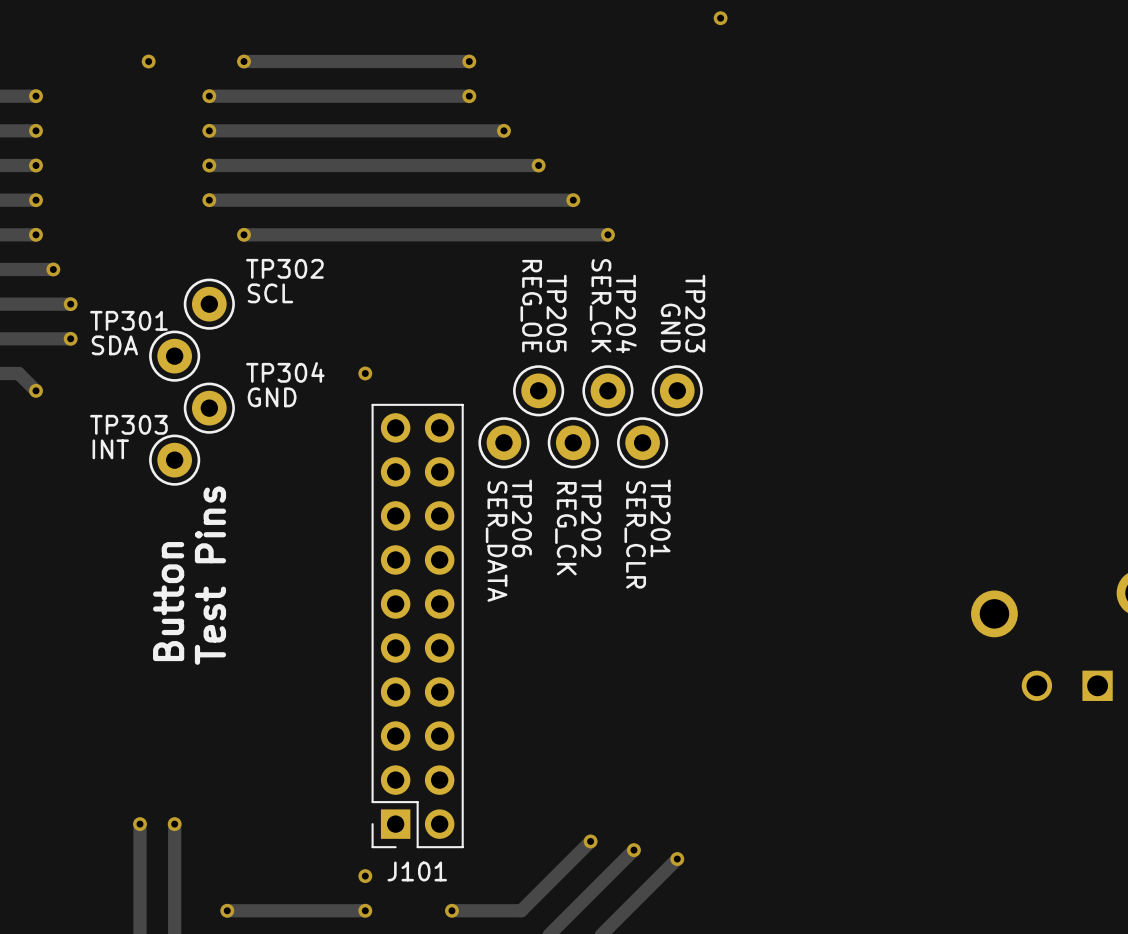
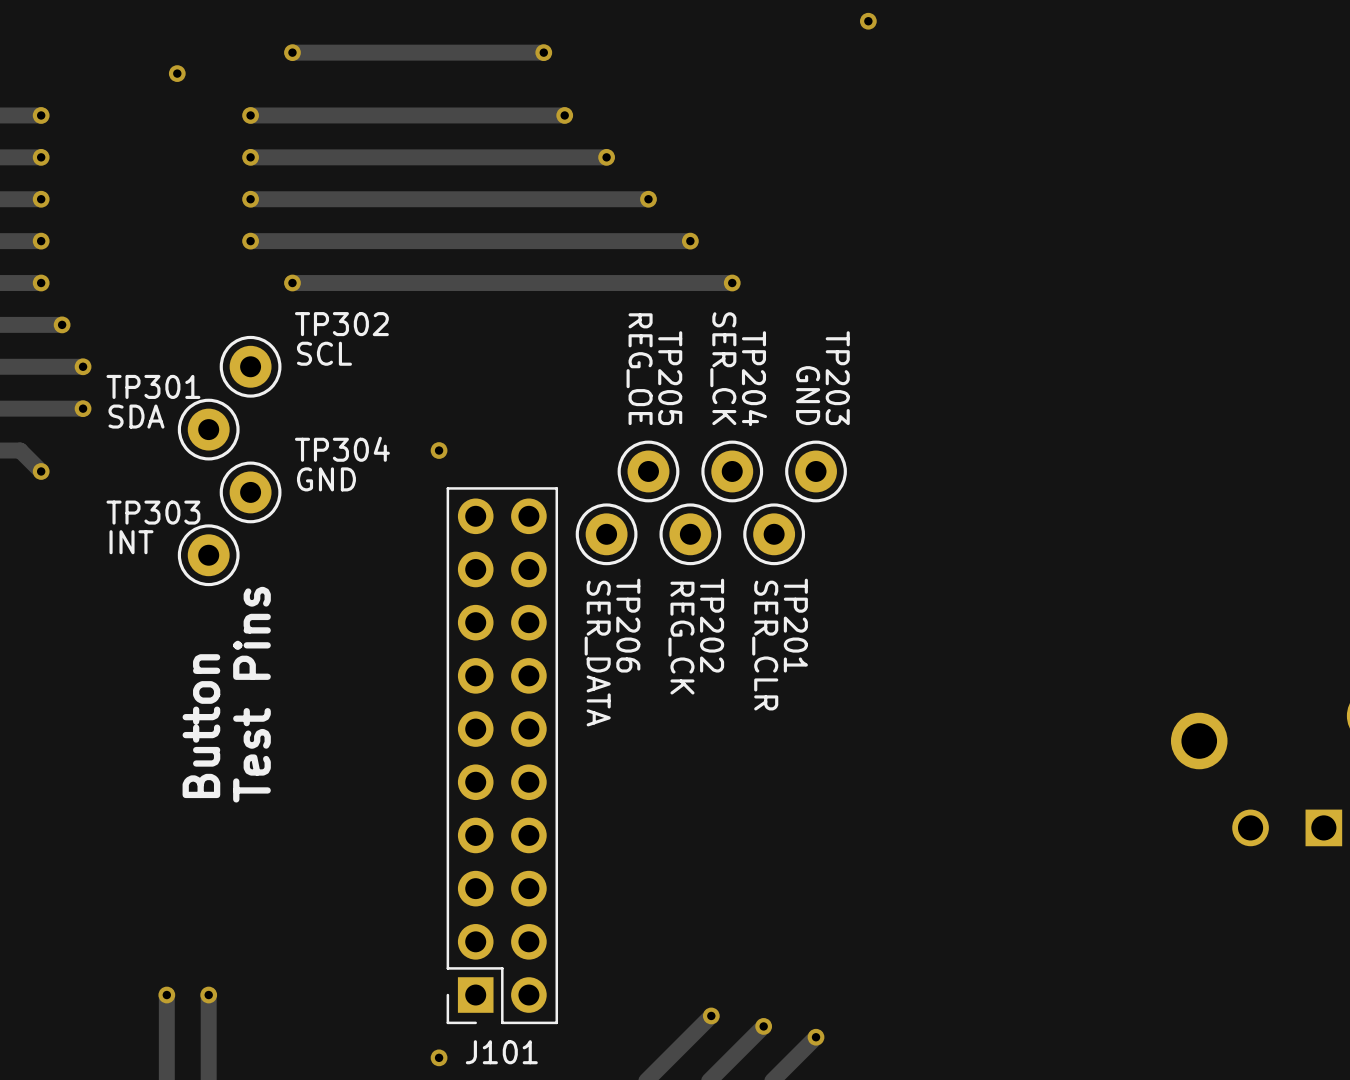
track: none -> (543, 52) (292, 52)
via position: (243, 61) -> (292, 52)
track: (469, 61) (243, 61) -> none
via position: (469, 61) -> (543, 52)

